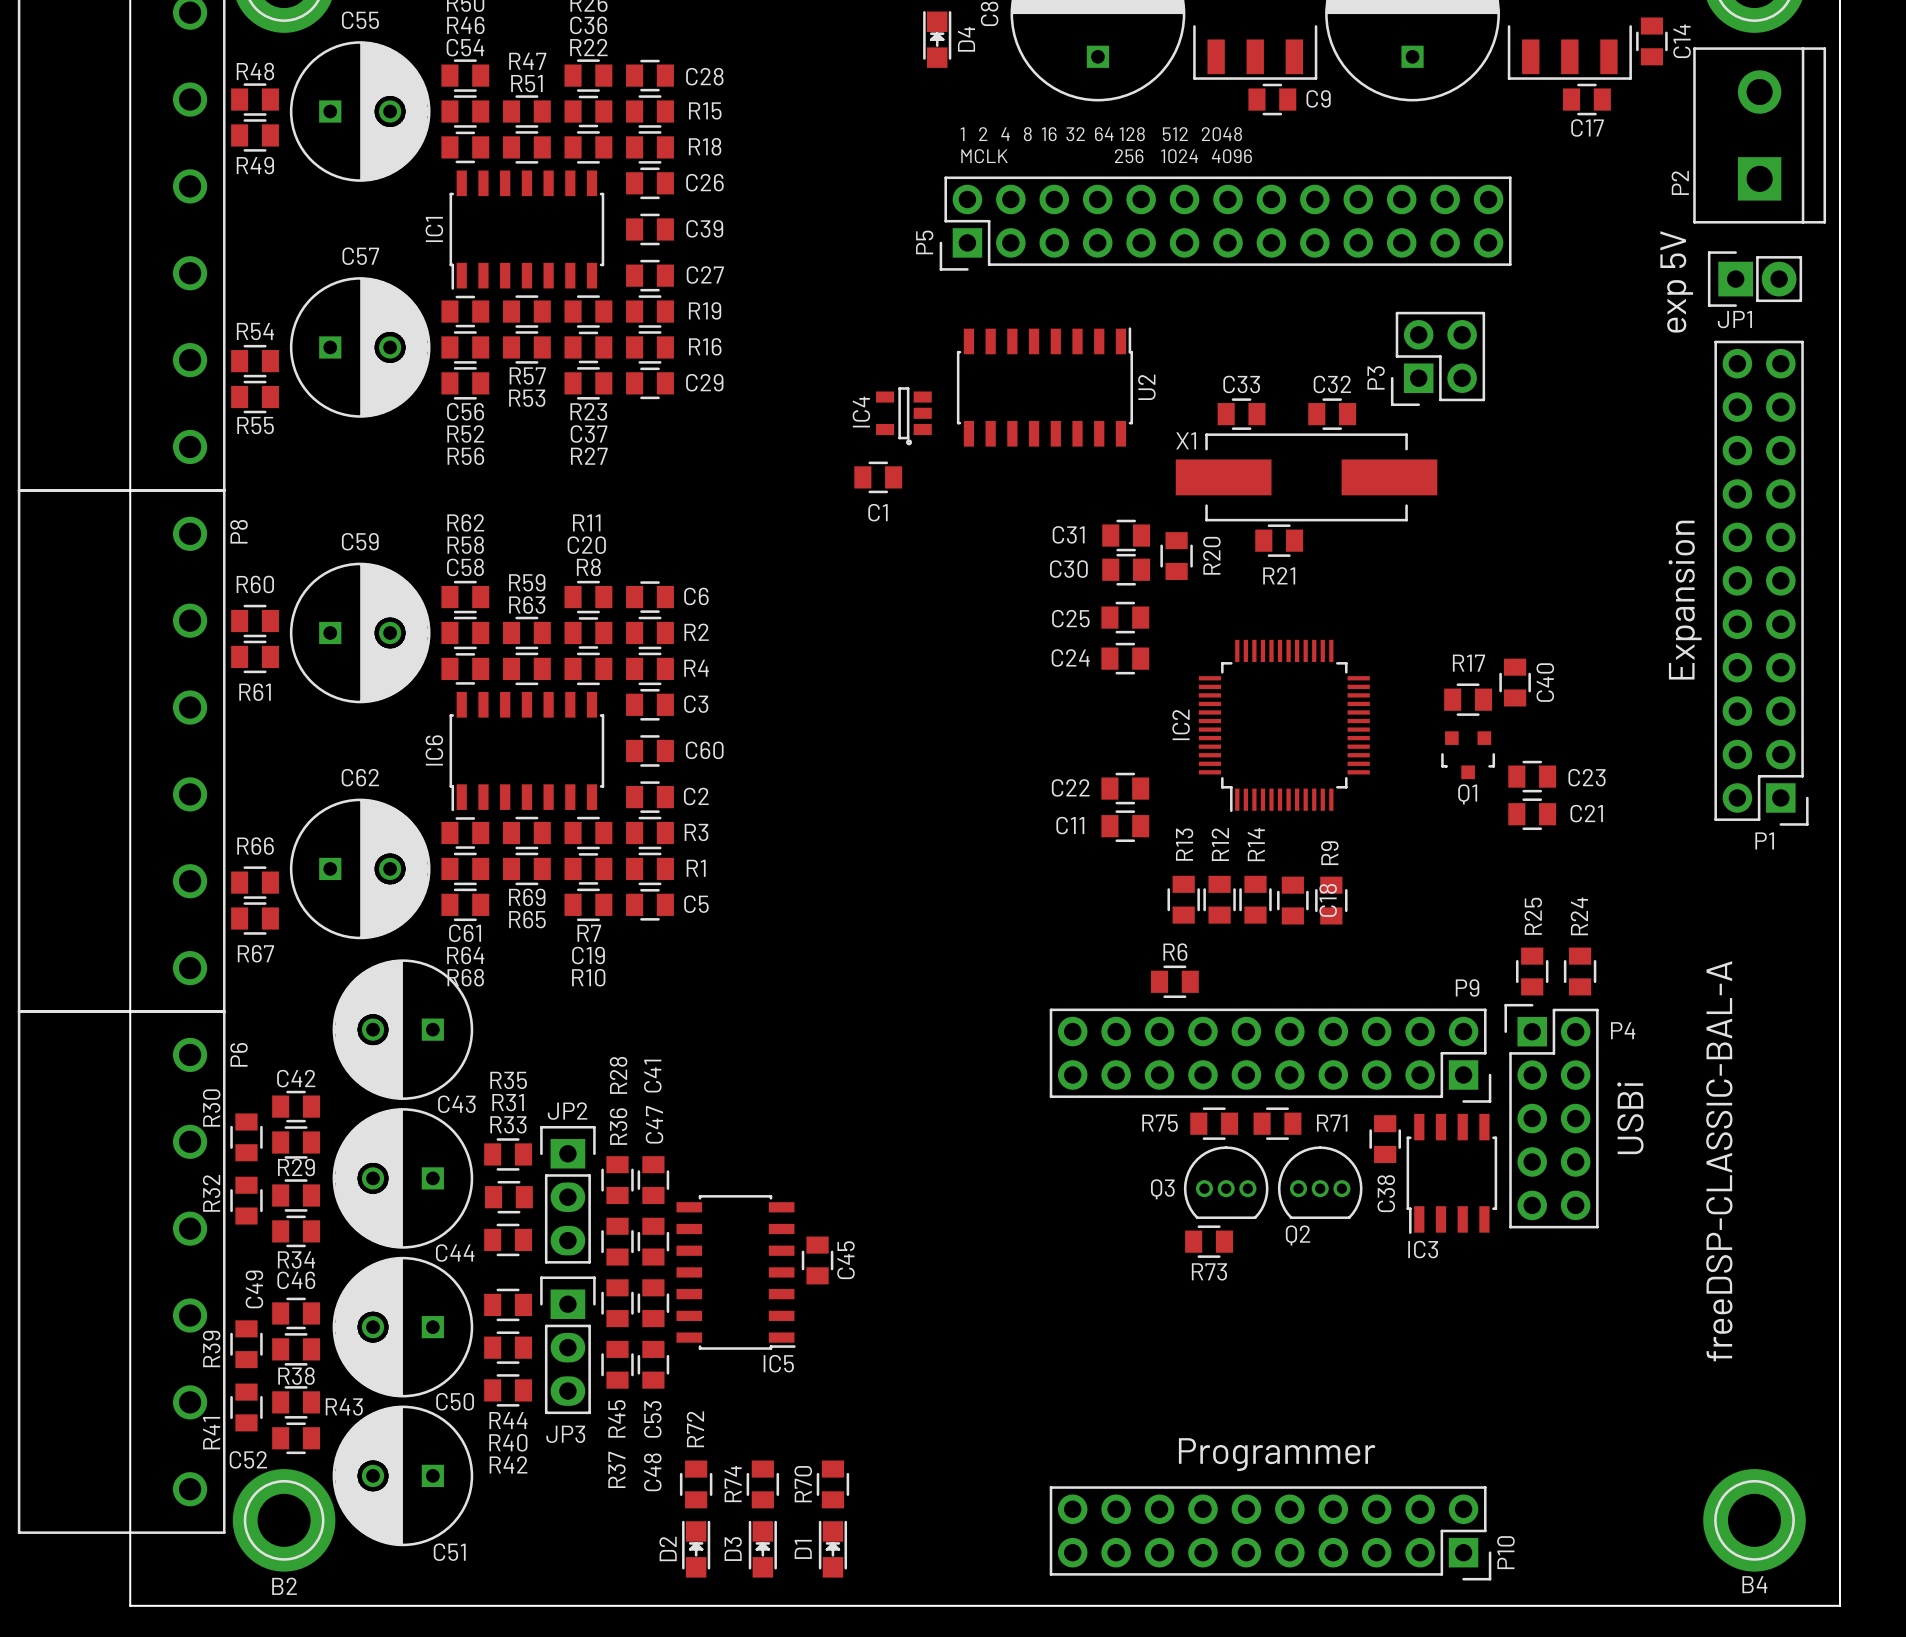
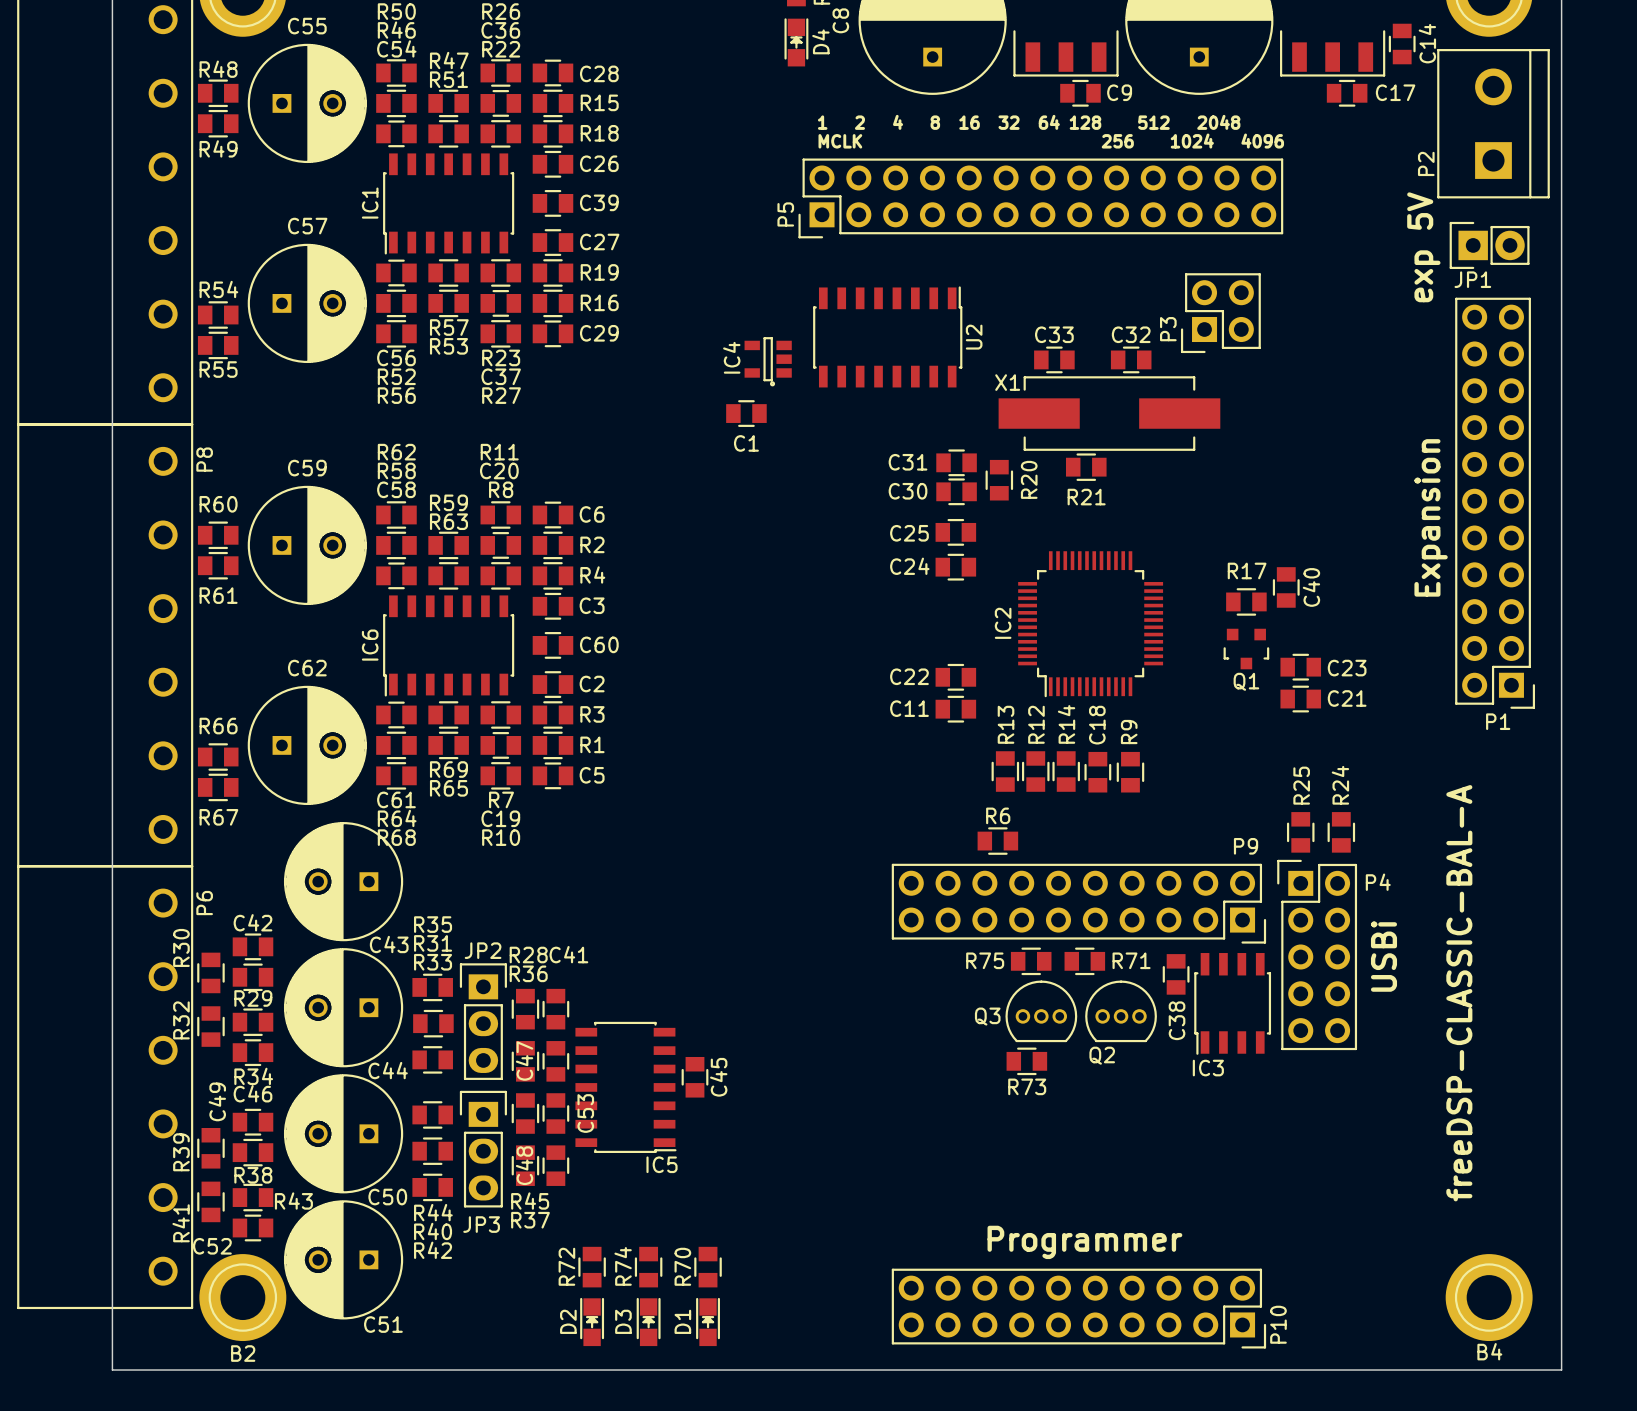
C17 name position: C17 (1587, 127) -> C17 (1395, 92)
C18 name position: C18 (1328, 900) -> C18 (1097, 725)
R28 name rotation: 0° (618, 1075) -> 90° clockwise (528, 955)
C41 name rotation: 0° (652, 1076) -> 90° clockwise (568, 954)
C47 name position: C47 (654, 1124) -> C47 (524, 1060)
R36 name rotation: 0° (618, 1126) -> 90° clockwise (528, 973)
R45 name rotation: 0° (616, 1418) -> 90° clockwise (530, 1201)
C53 name position: C53 (652, 1419) -> C53 (585, 1113)
R72 name position: R72 (695, 1429) -> R72 (566, 1266)
R37 name rotation: 0° (616, 1469) -> 90° clockwise (530, 1220)
C48 name position: C48 (652, 1472) -> C48 (524, 1165)

